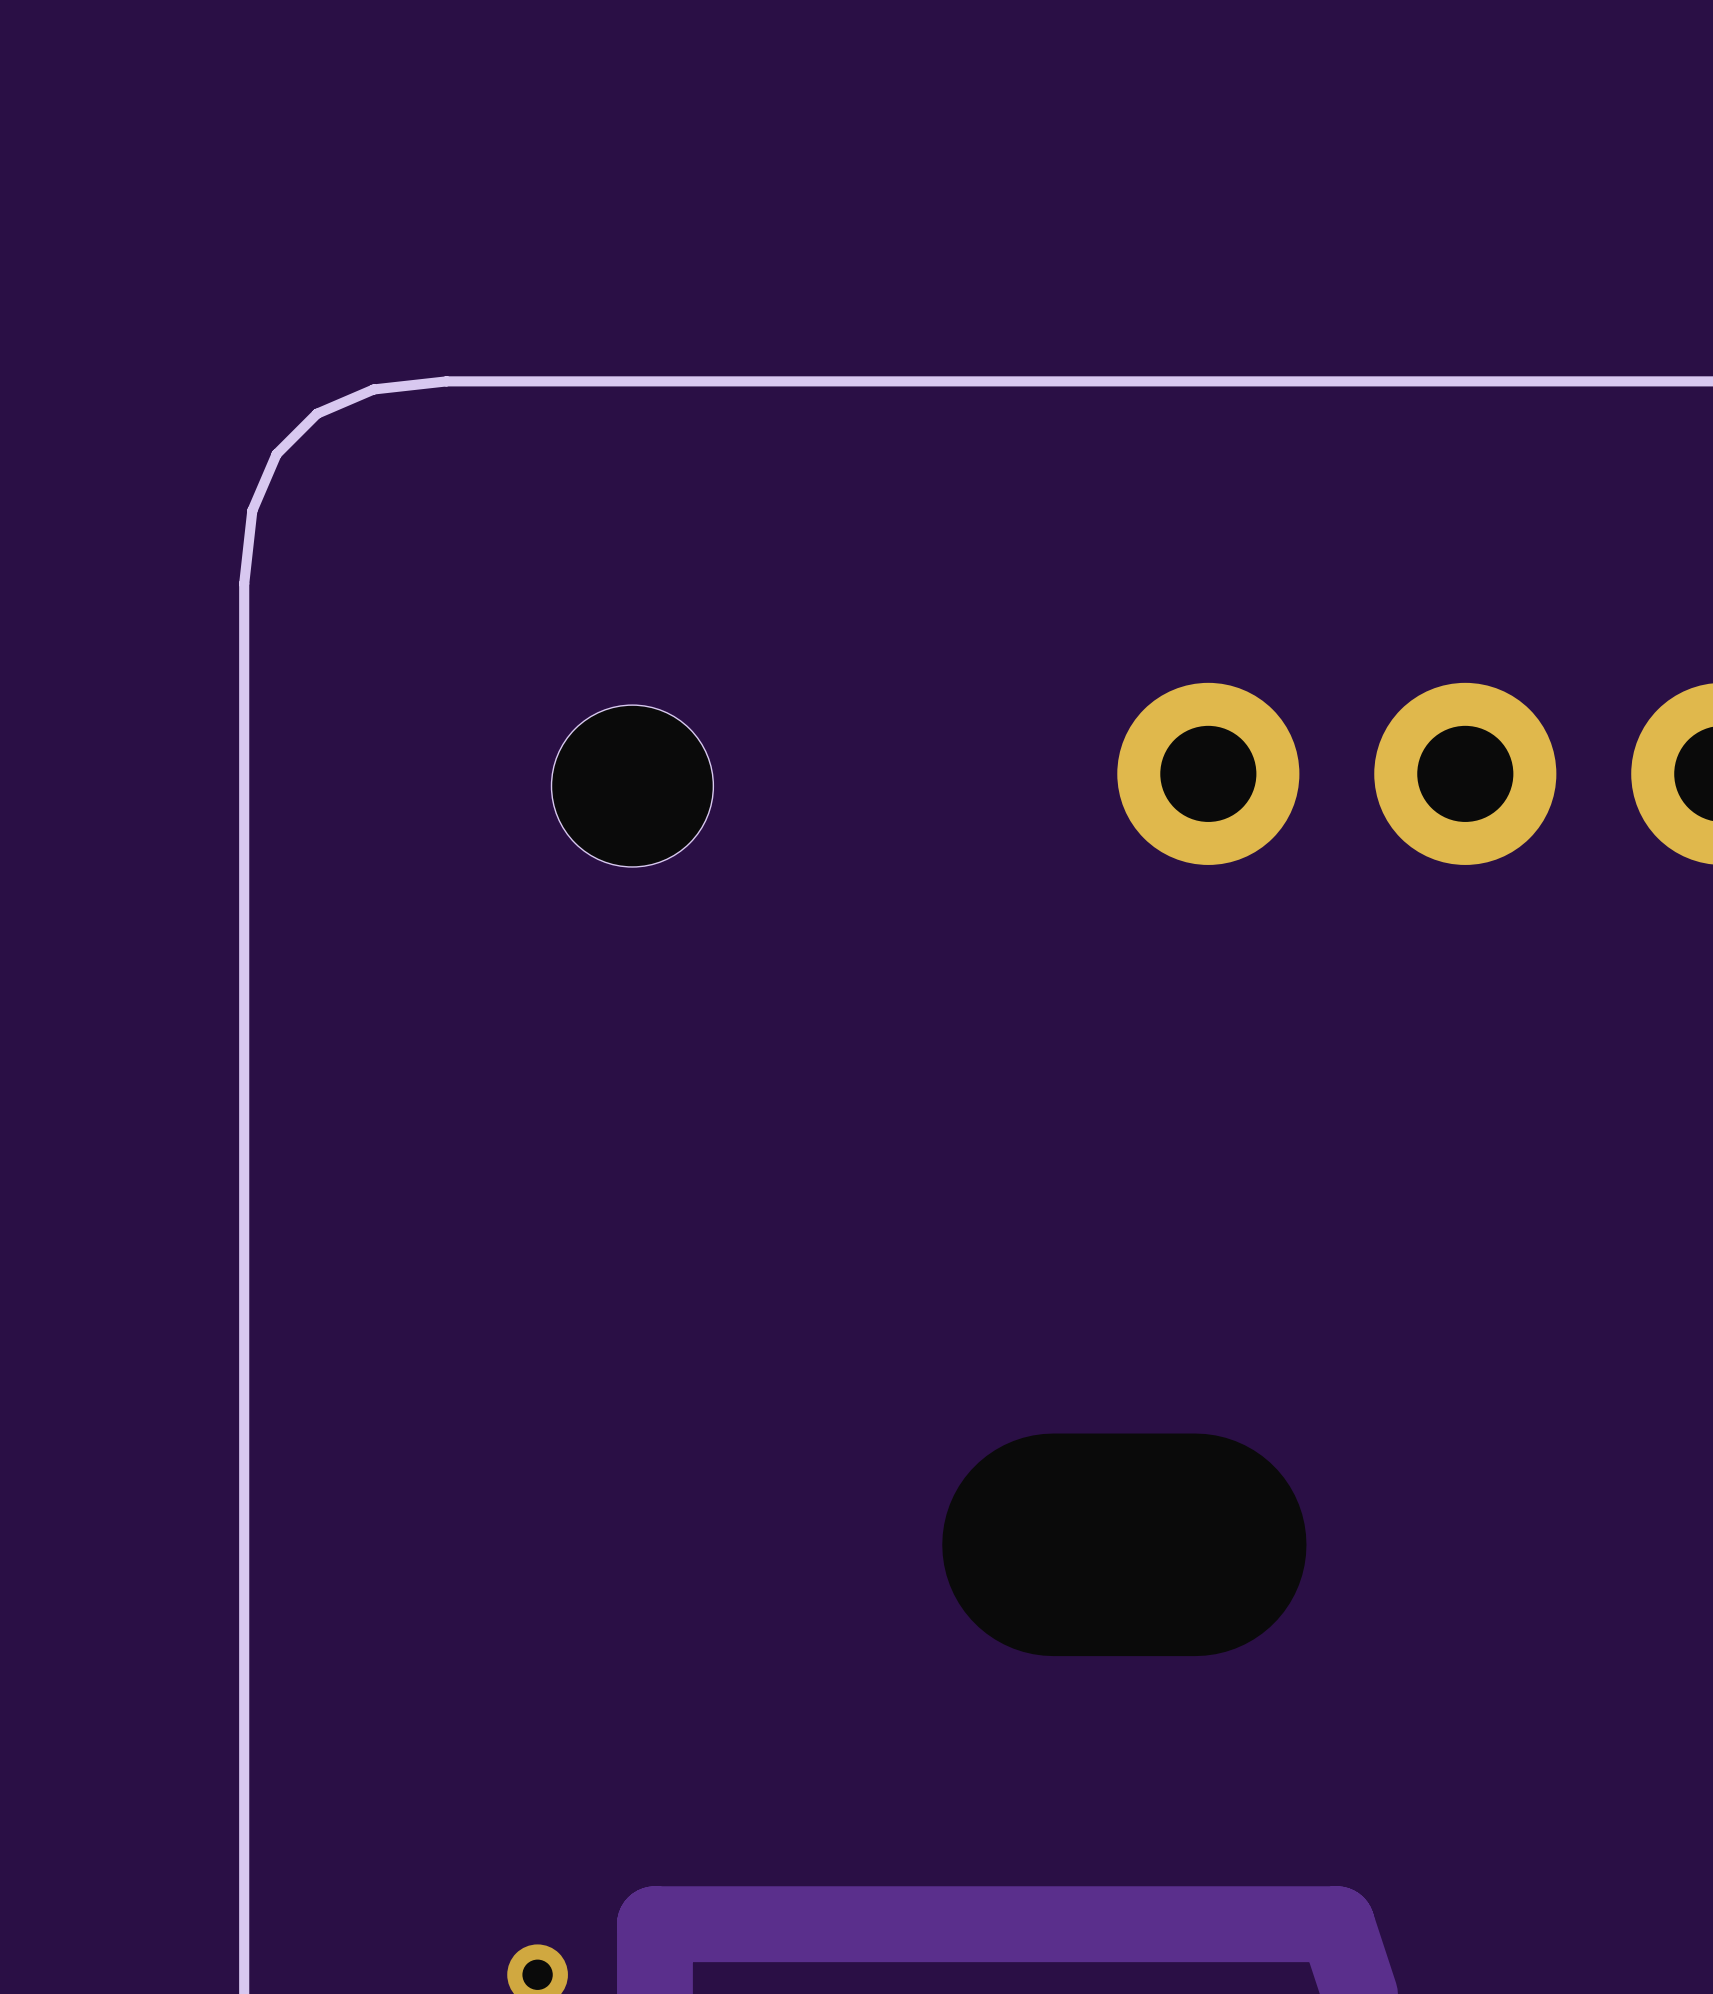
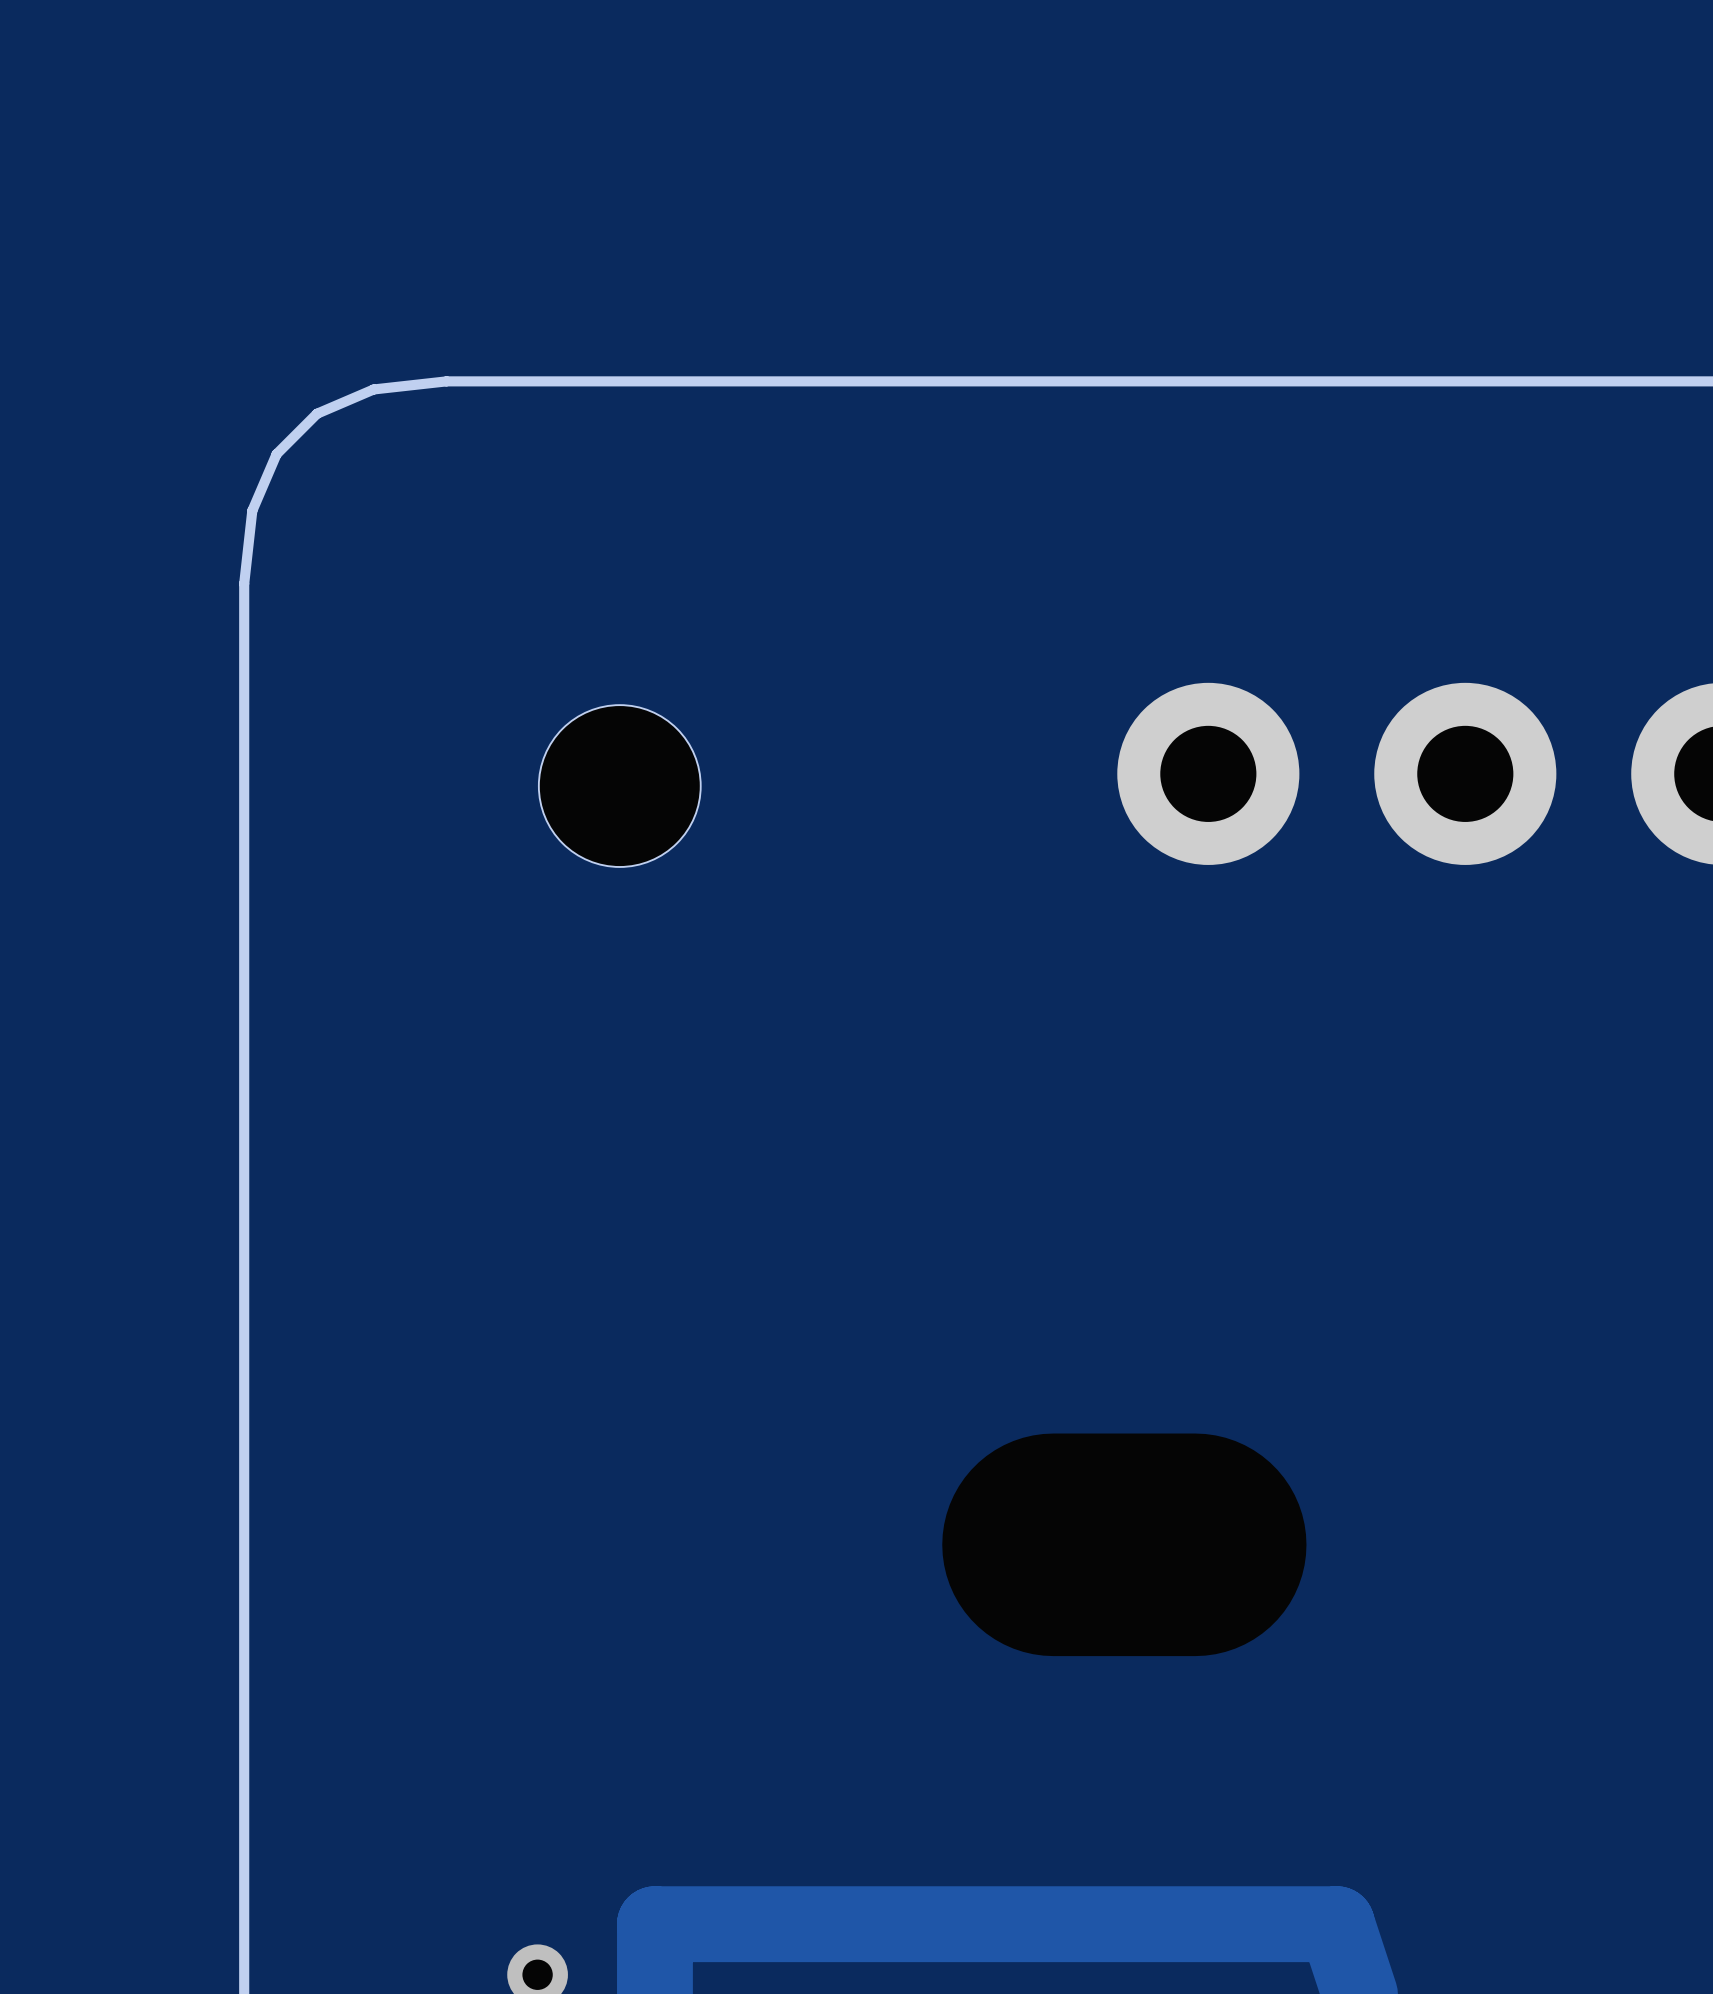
part position: (632, 786) -> (619, 786)

